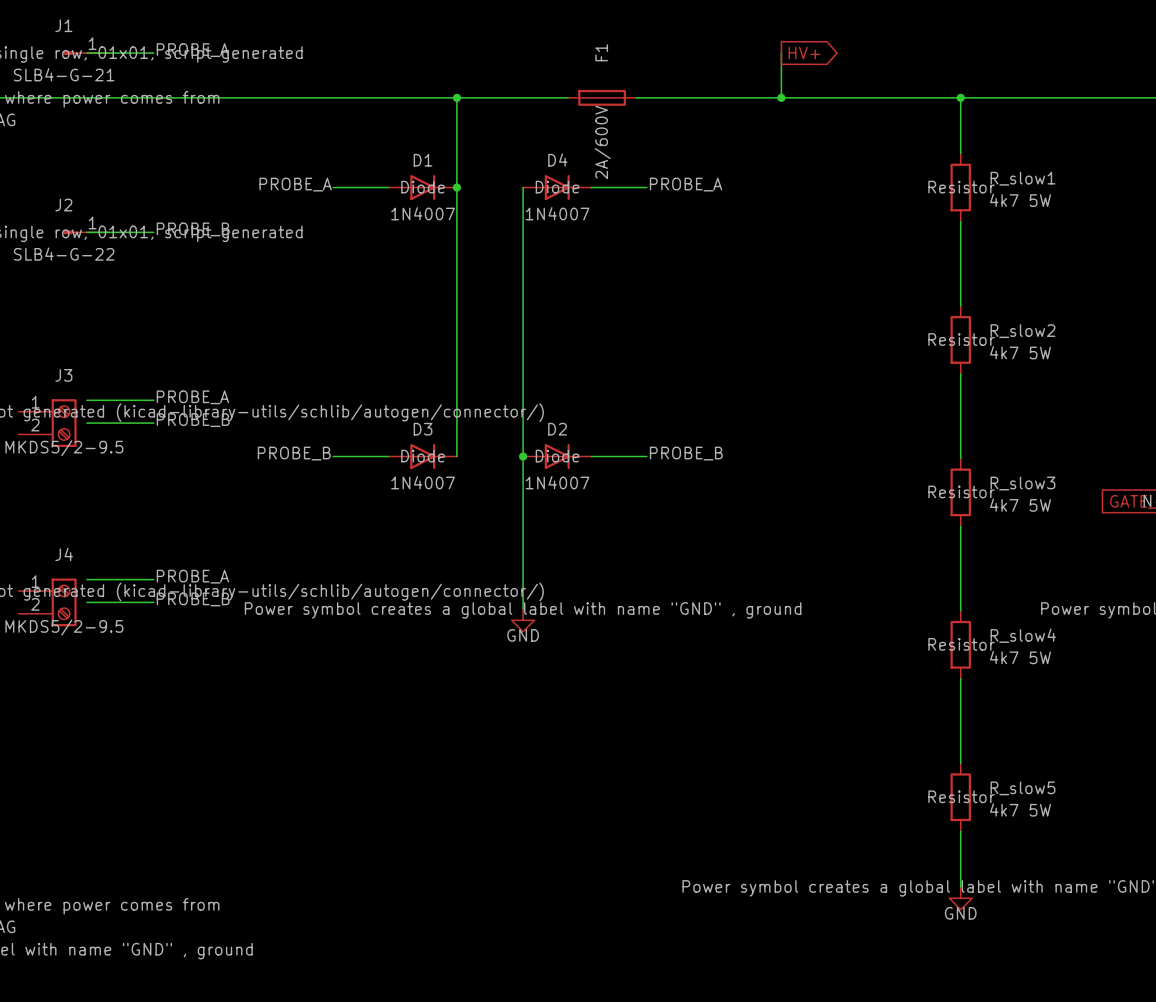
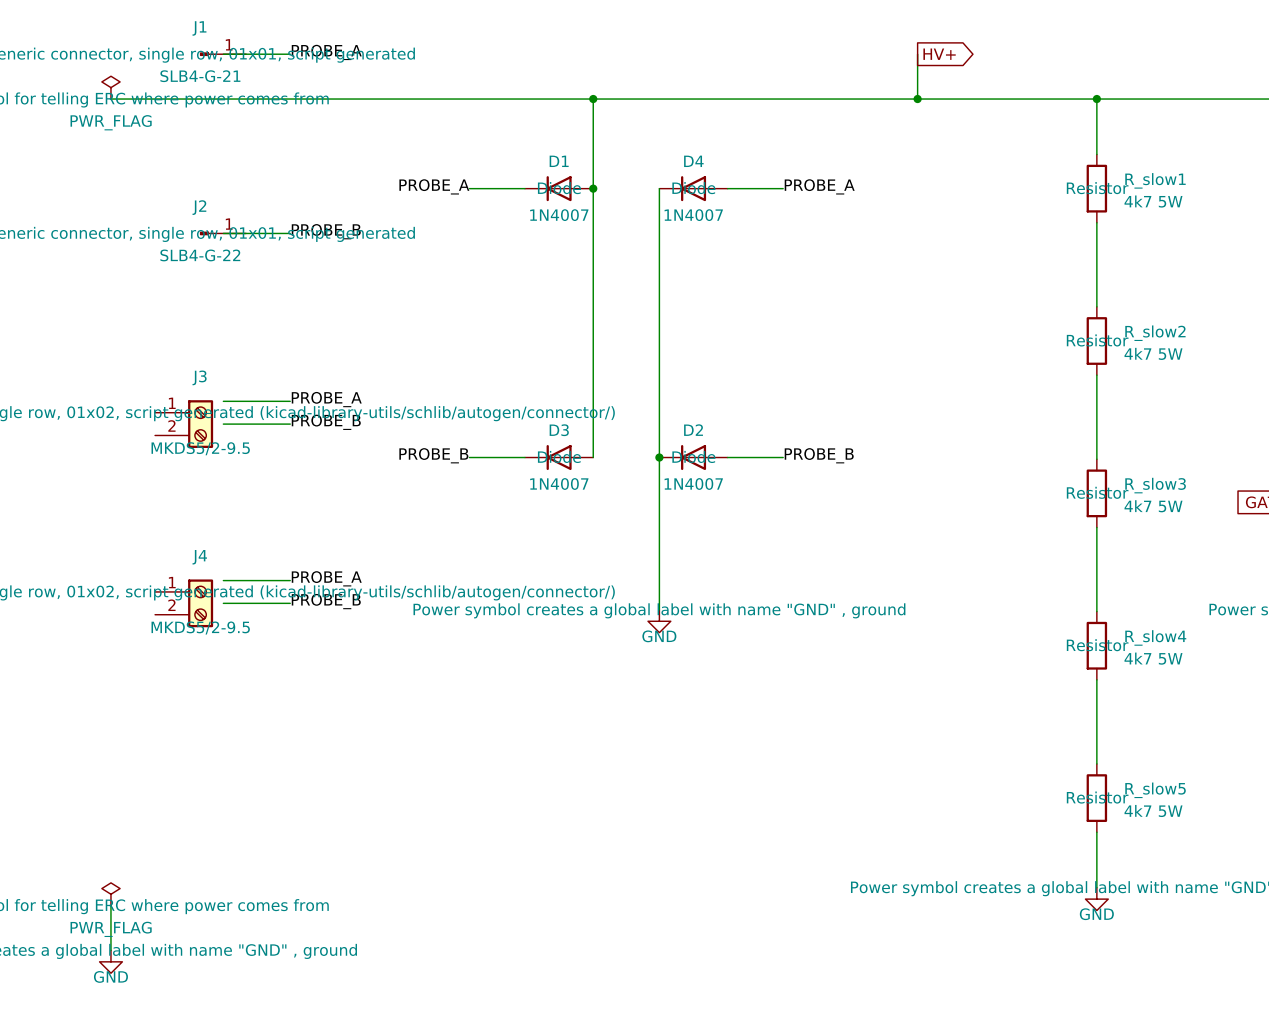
F1: 2A/600V (602, 97) -> none
D1 rotation: 0° (422, 187) -> 180° (559, 188)
D4 rotation: 0° (557, 187) -> 180° (693, 188)
D3 rotation: 0° (422, 456) -> 180° (559, 457)
D2 rotation: 0° (557, 456) -> 180° (693, 457)

